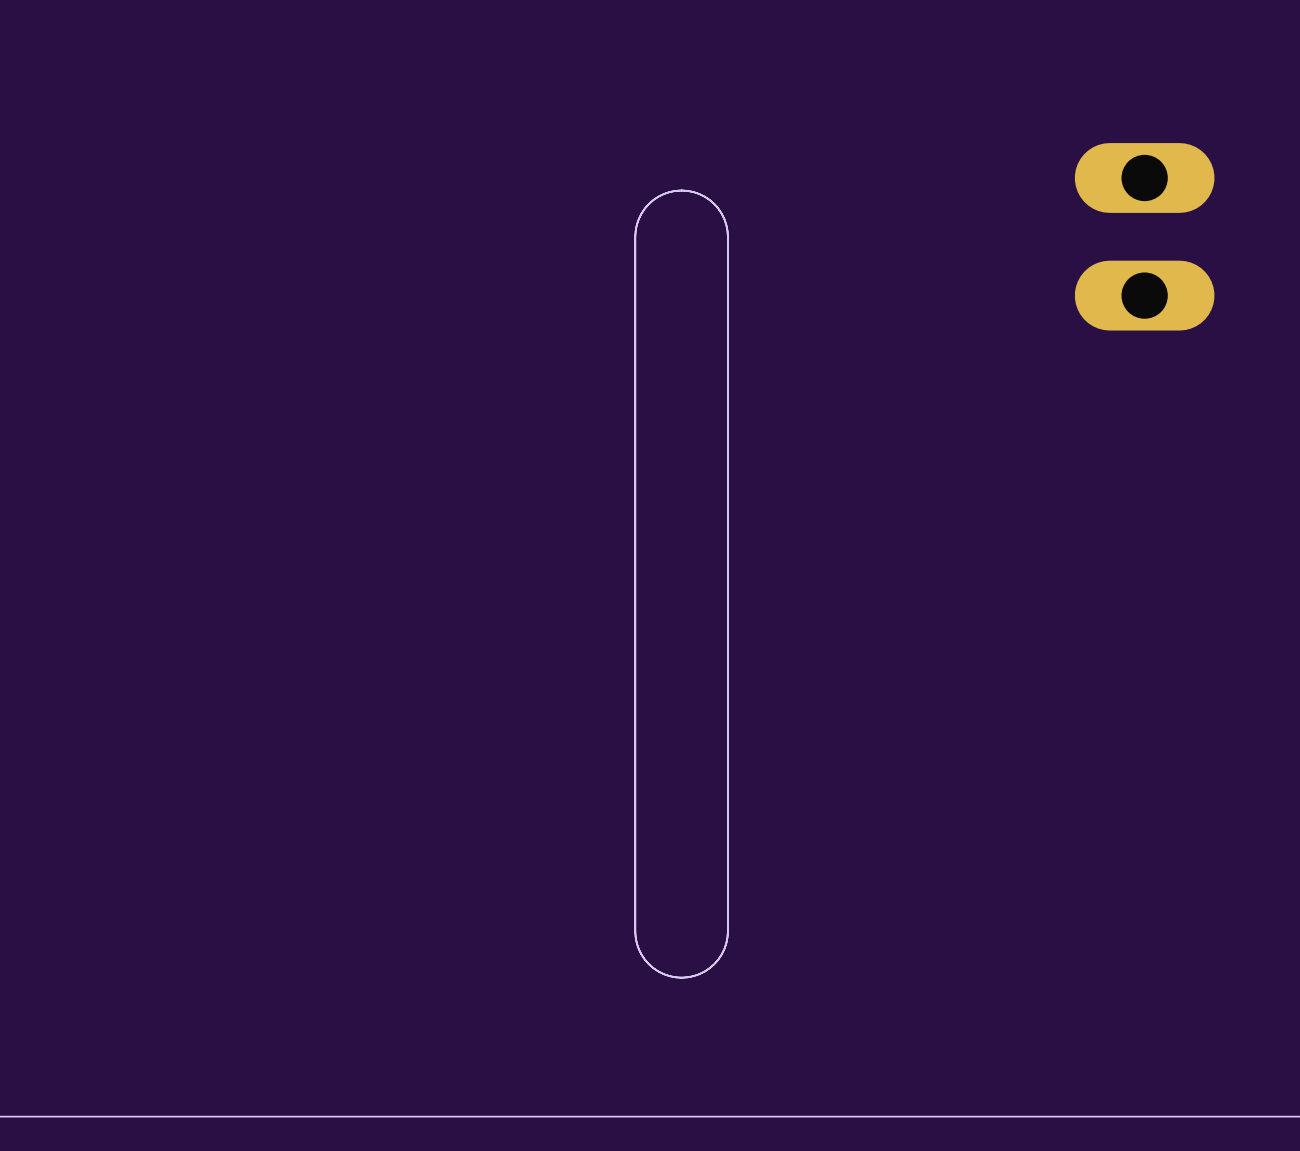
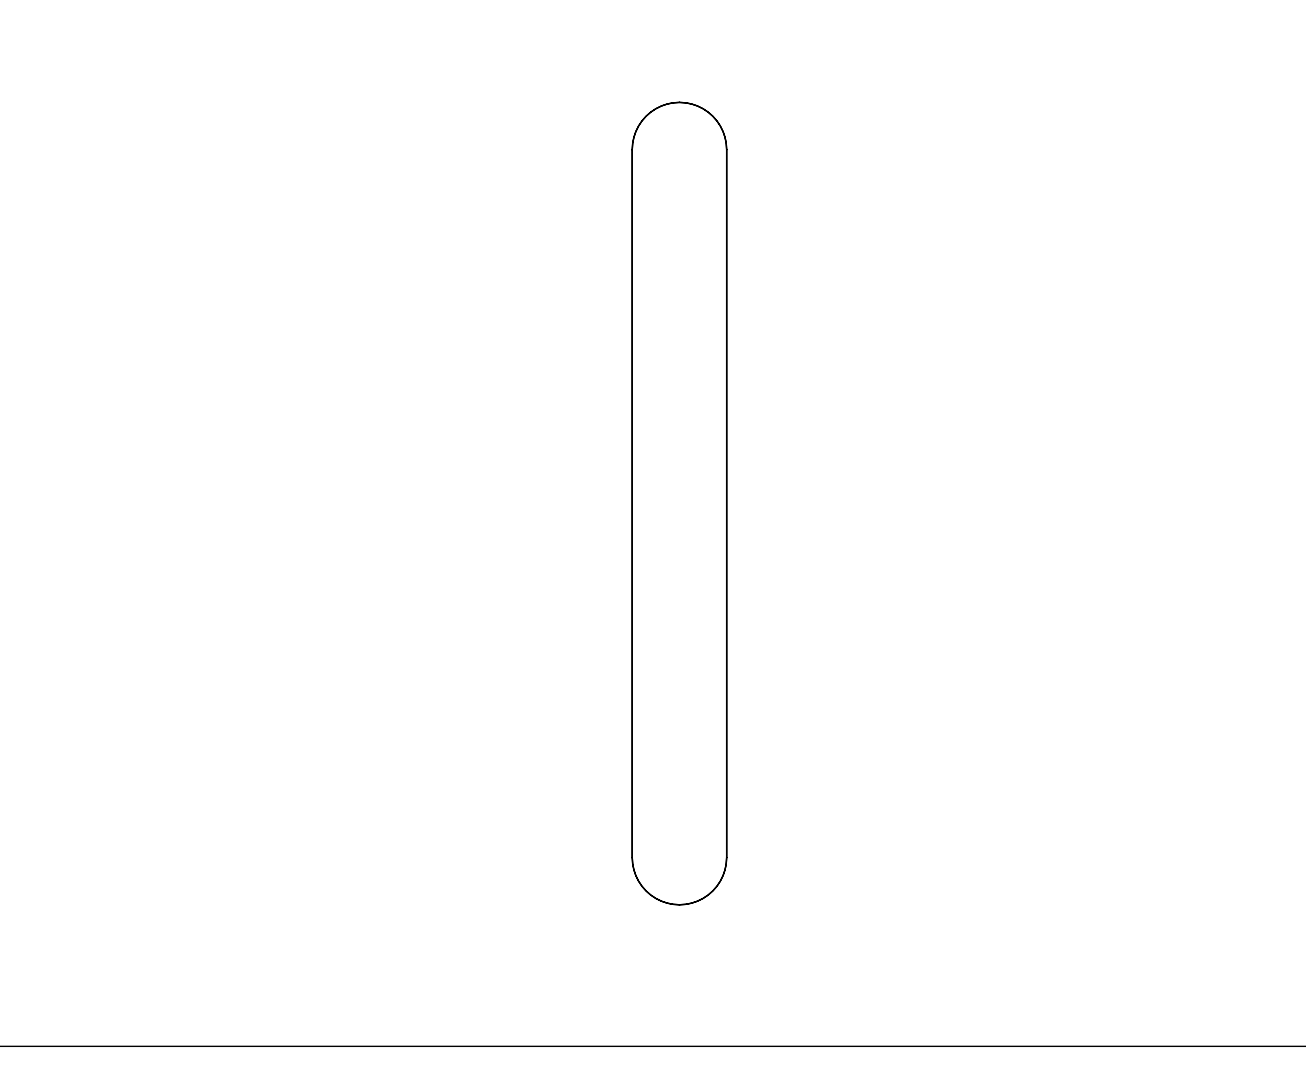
part: (1144, 236) -> none

